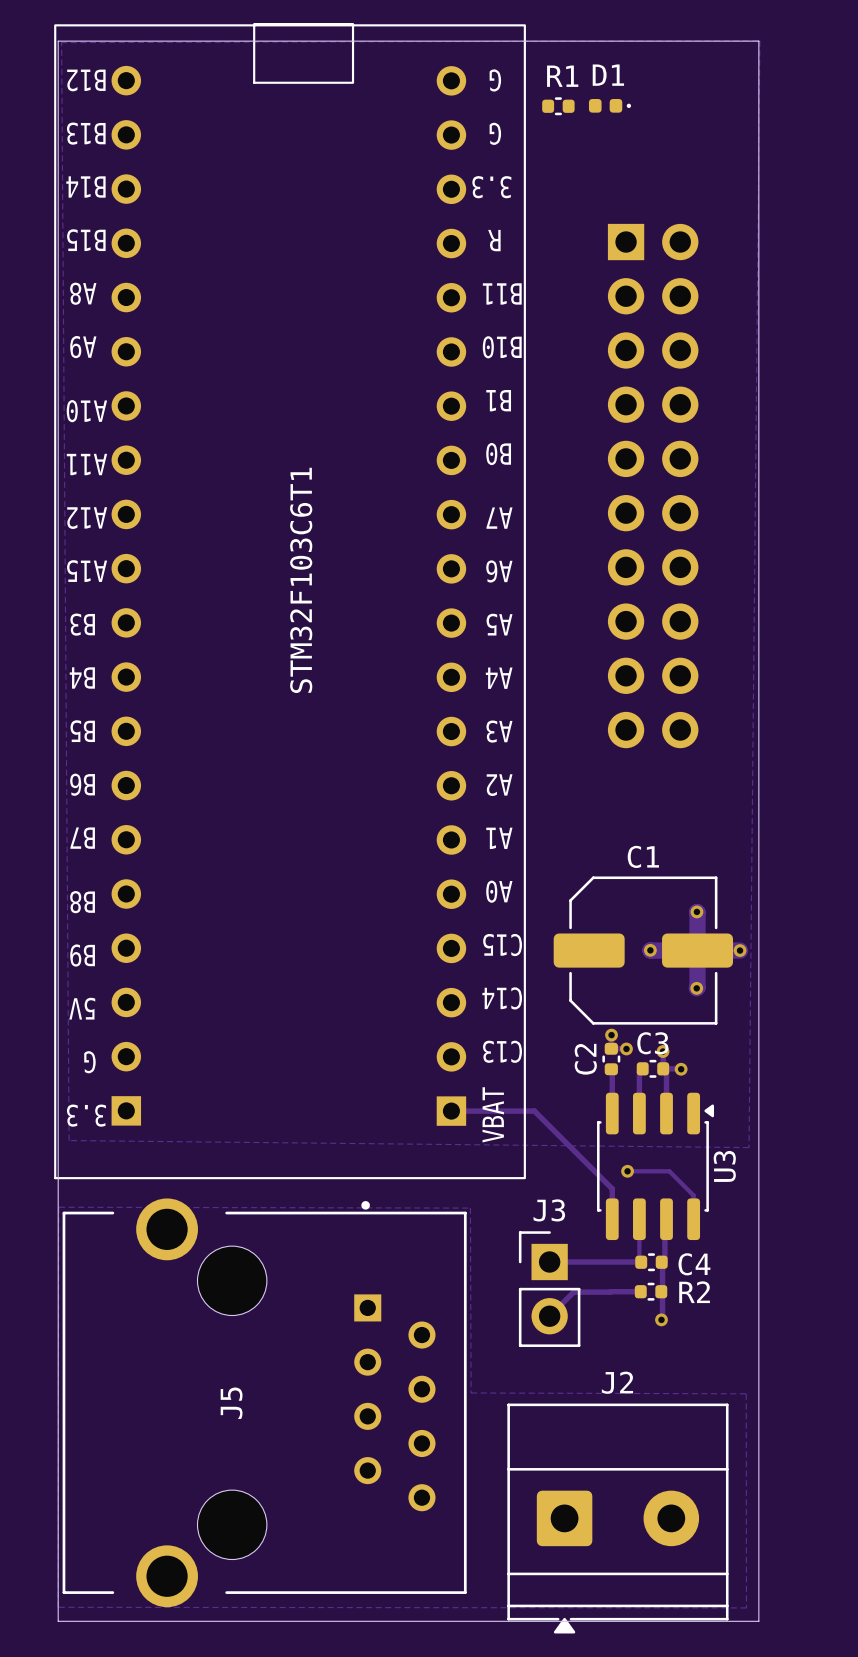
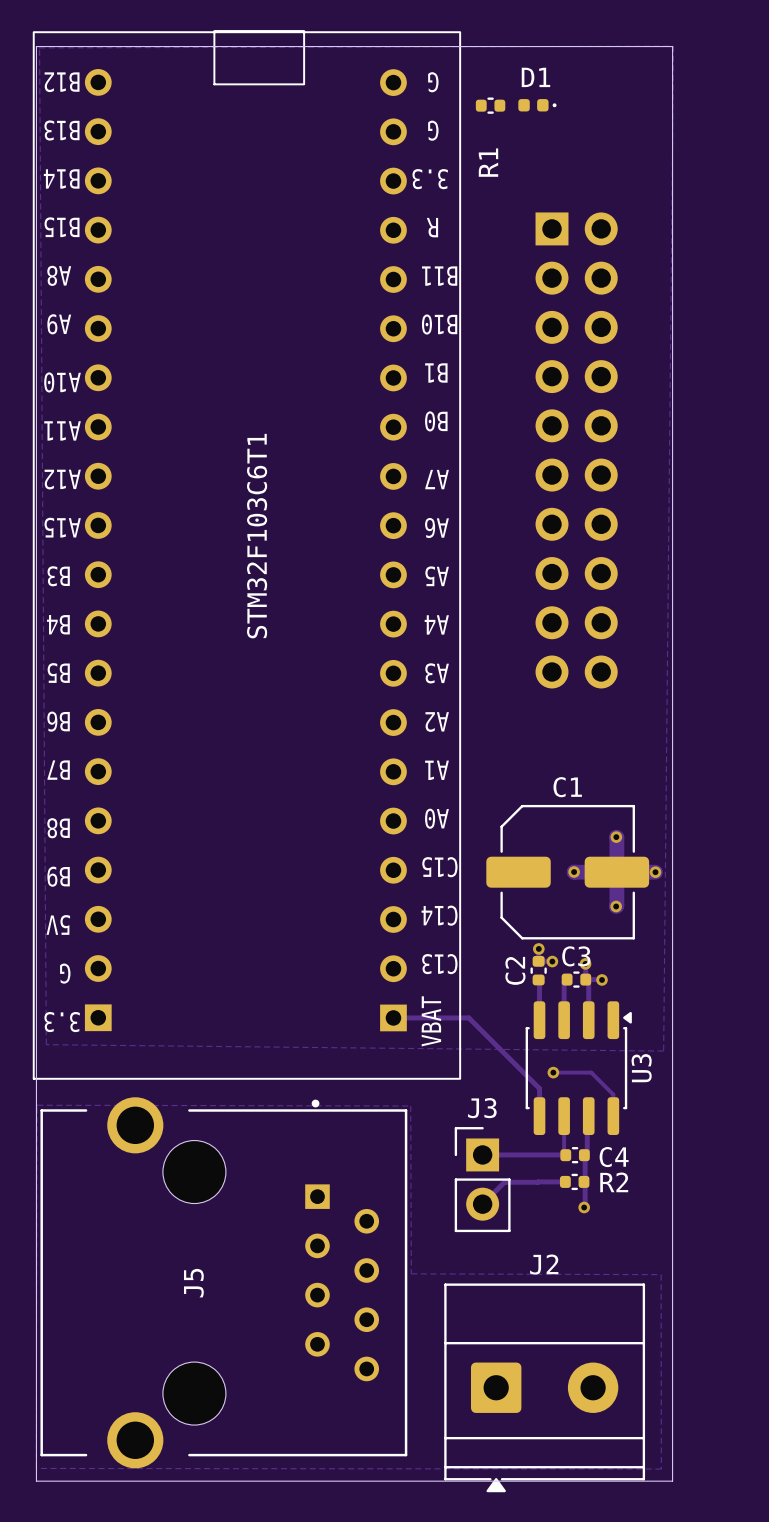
R1 name rotation: 0° (562, 76) -> 90° counterclockwise (488, 162)
R1 name position: R1 (562, 76) -> R1 (488, 162)

